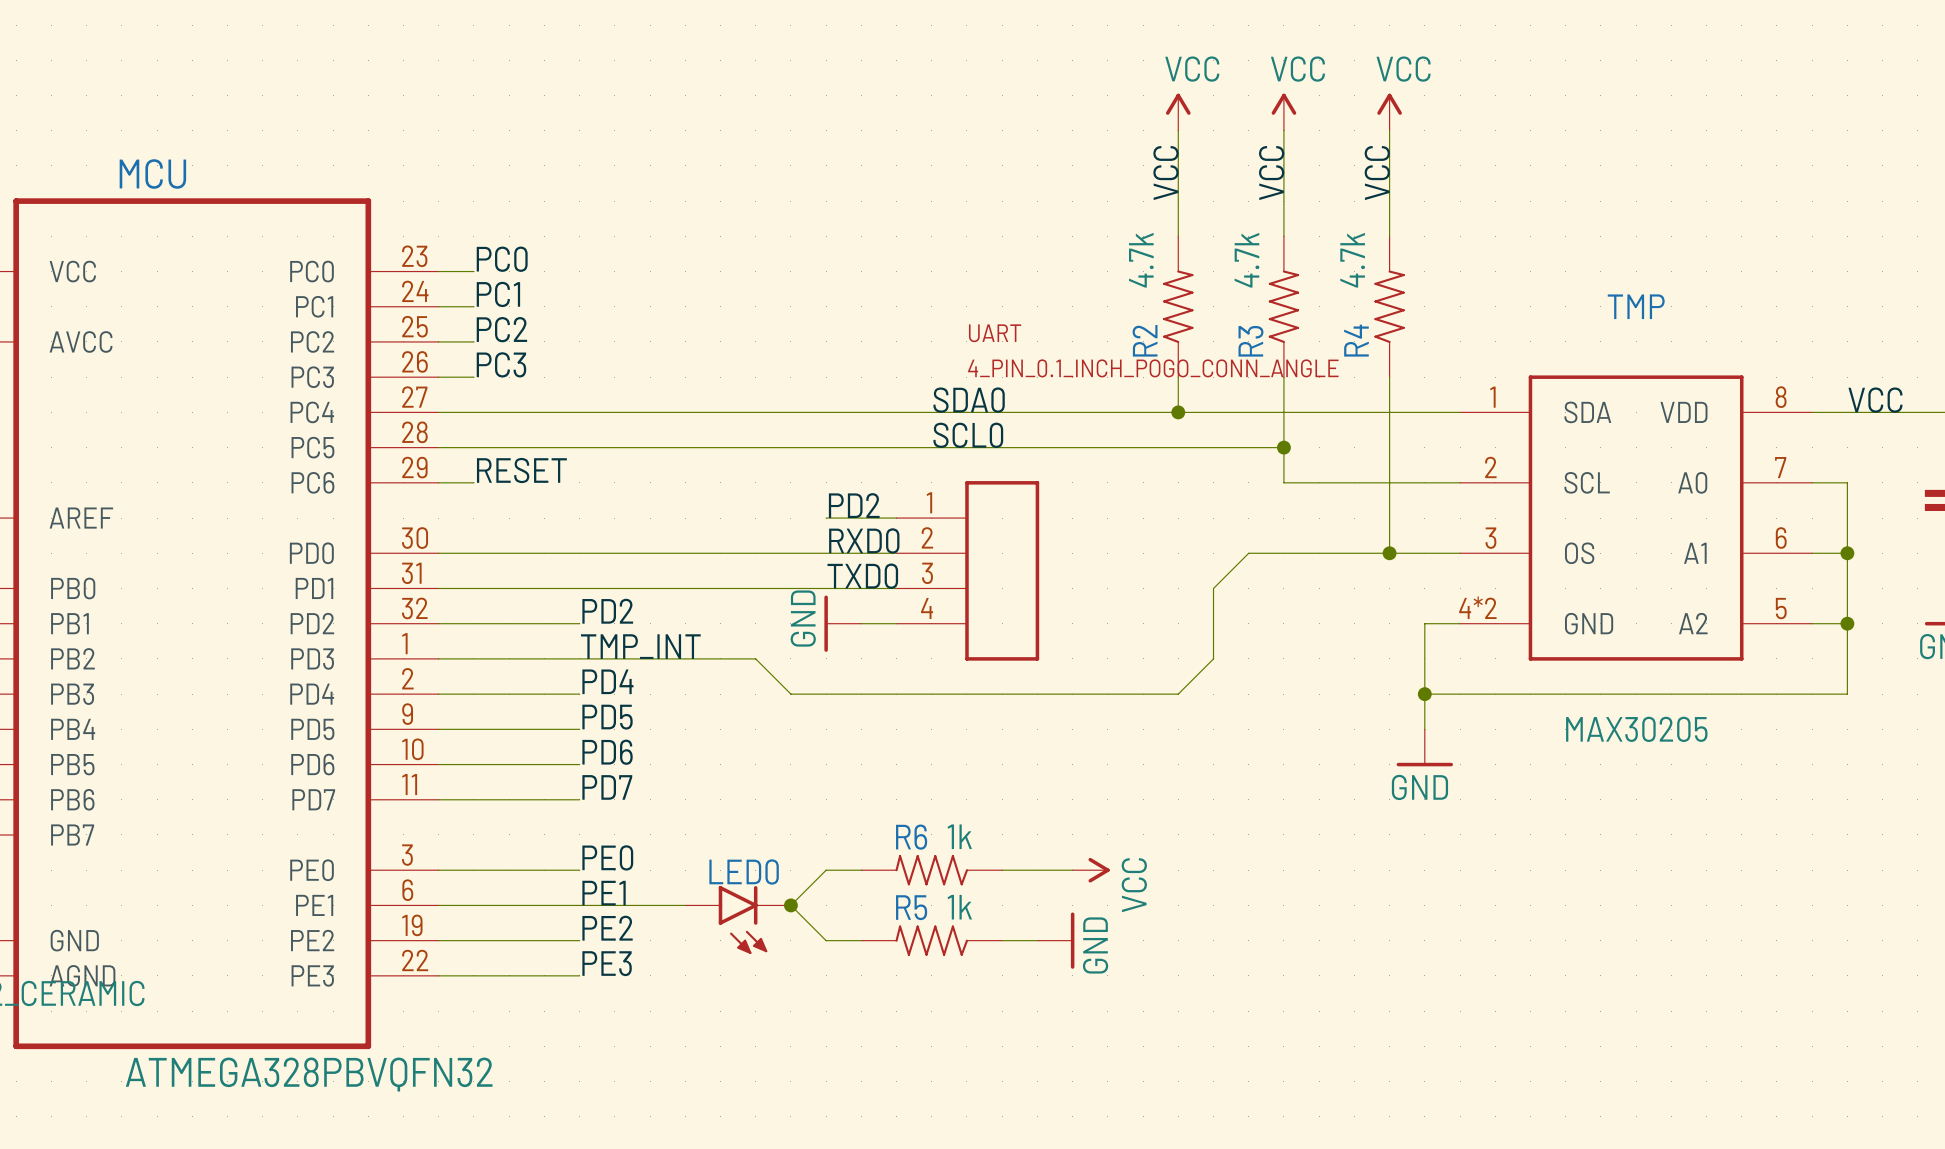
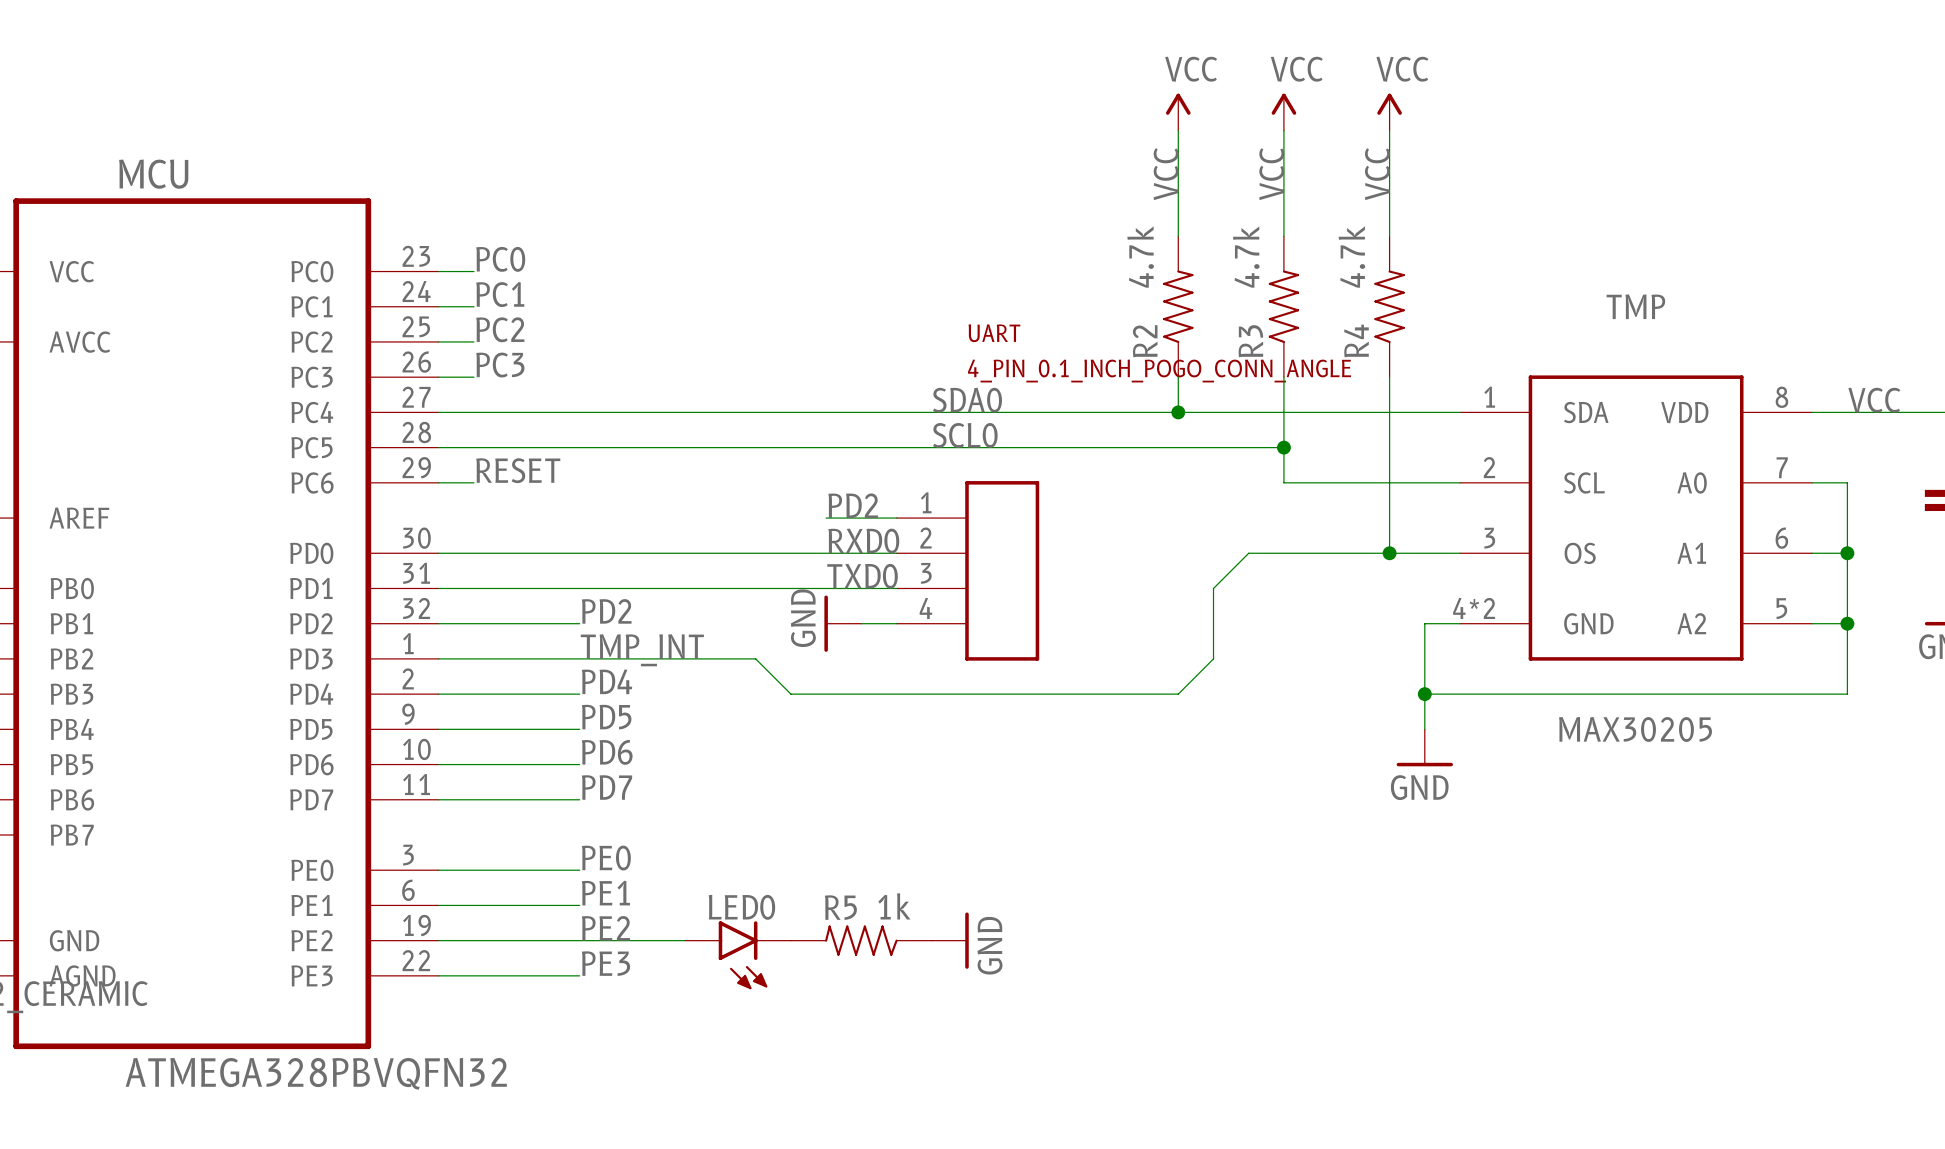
wire: (861, 870) (826, 870) (790, 905) (826, 940) (861, 940) -> none
R6: 1k (931, 870) -> none
wire: (1002, 870) (1072, 870) -> none
power symbol: VCC (1091, 870) -> none
wire: (579, 905) (685, 905) -> (579, 940) (685, 940)
junction: (790, 905) -> none
LED0 position: (738, 920) -> (738, 955)
R5 position: (931, 940) -> (861, 940)
wire: (1002, 940) (1037, 940) -> none
power symbol position: GND (1055, 940) -> GND (950, 940)

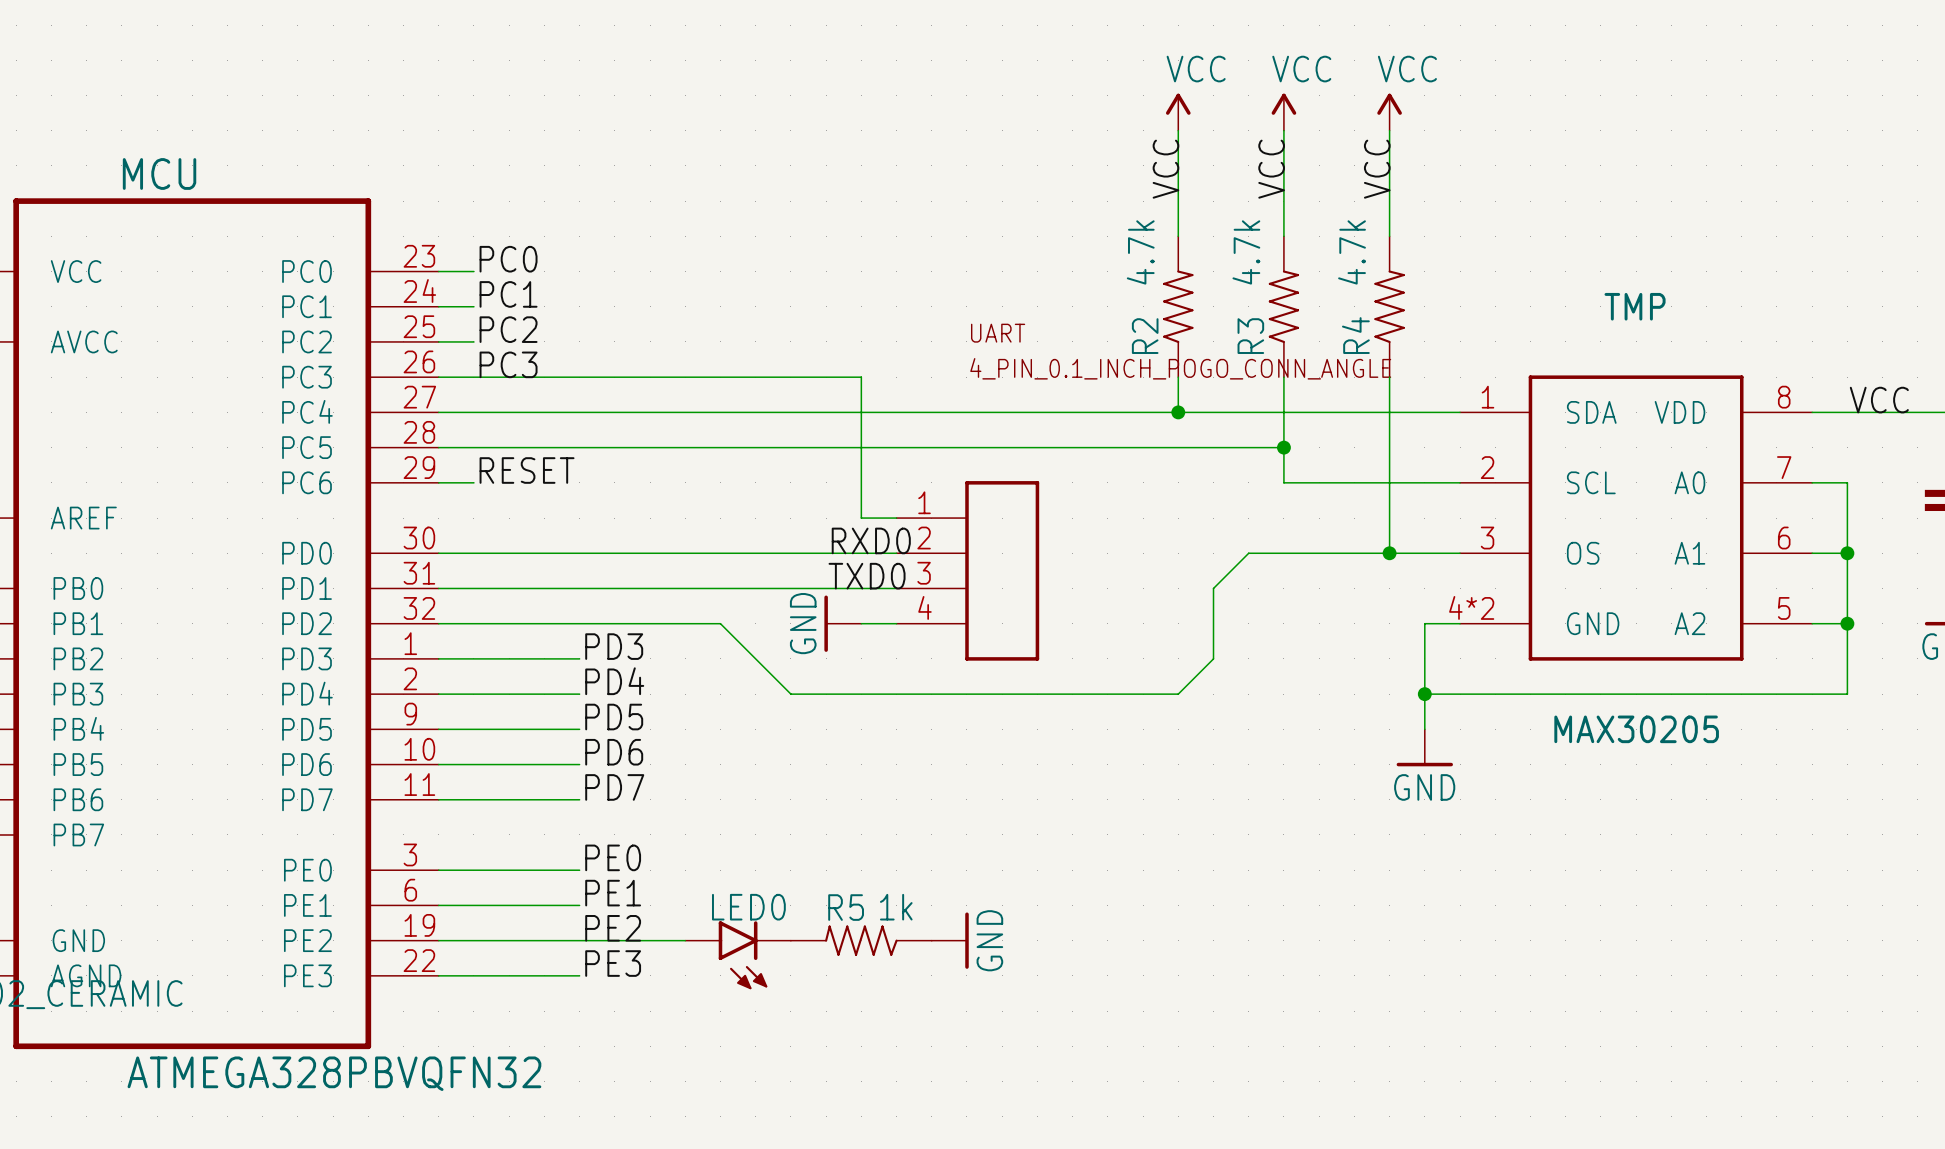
label: SDA0 (967, 400) -> none
label: SCL0 (965, 435) -> none
label: PD2 (853, 505) -> none
wire: (826, 518) (861, 518) -> (473, 377) (861, 377) (861, 518)
label: PD2 (606, 611) -> none
label: TMP_INT (642, 650) -> PD3 (614, 646)
wire: (579, 658) (755, 658) -> (579, 623) (720, 623) (755, 658)

